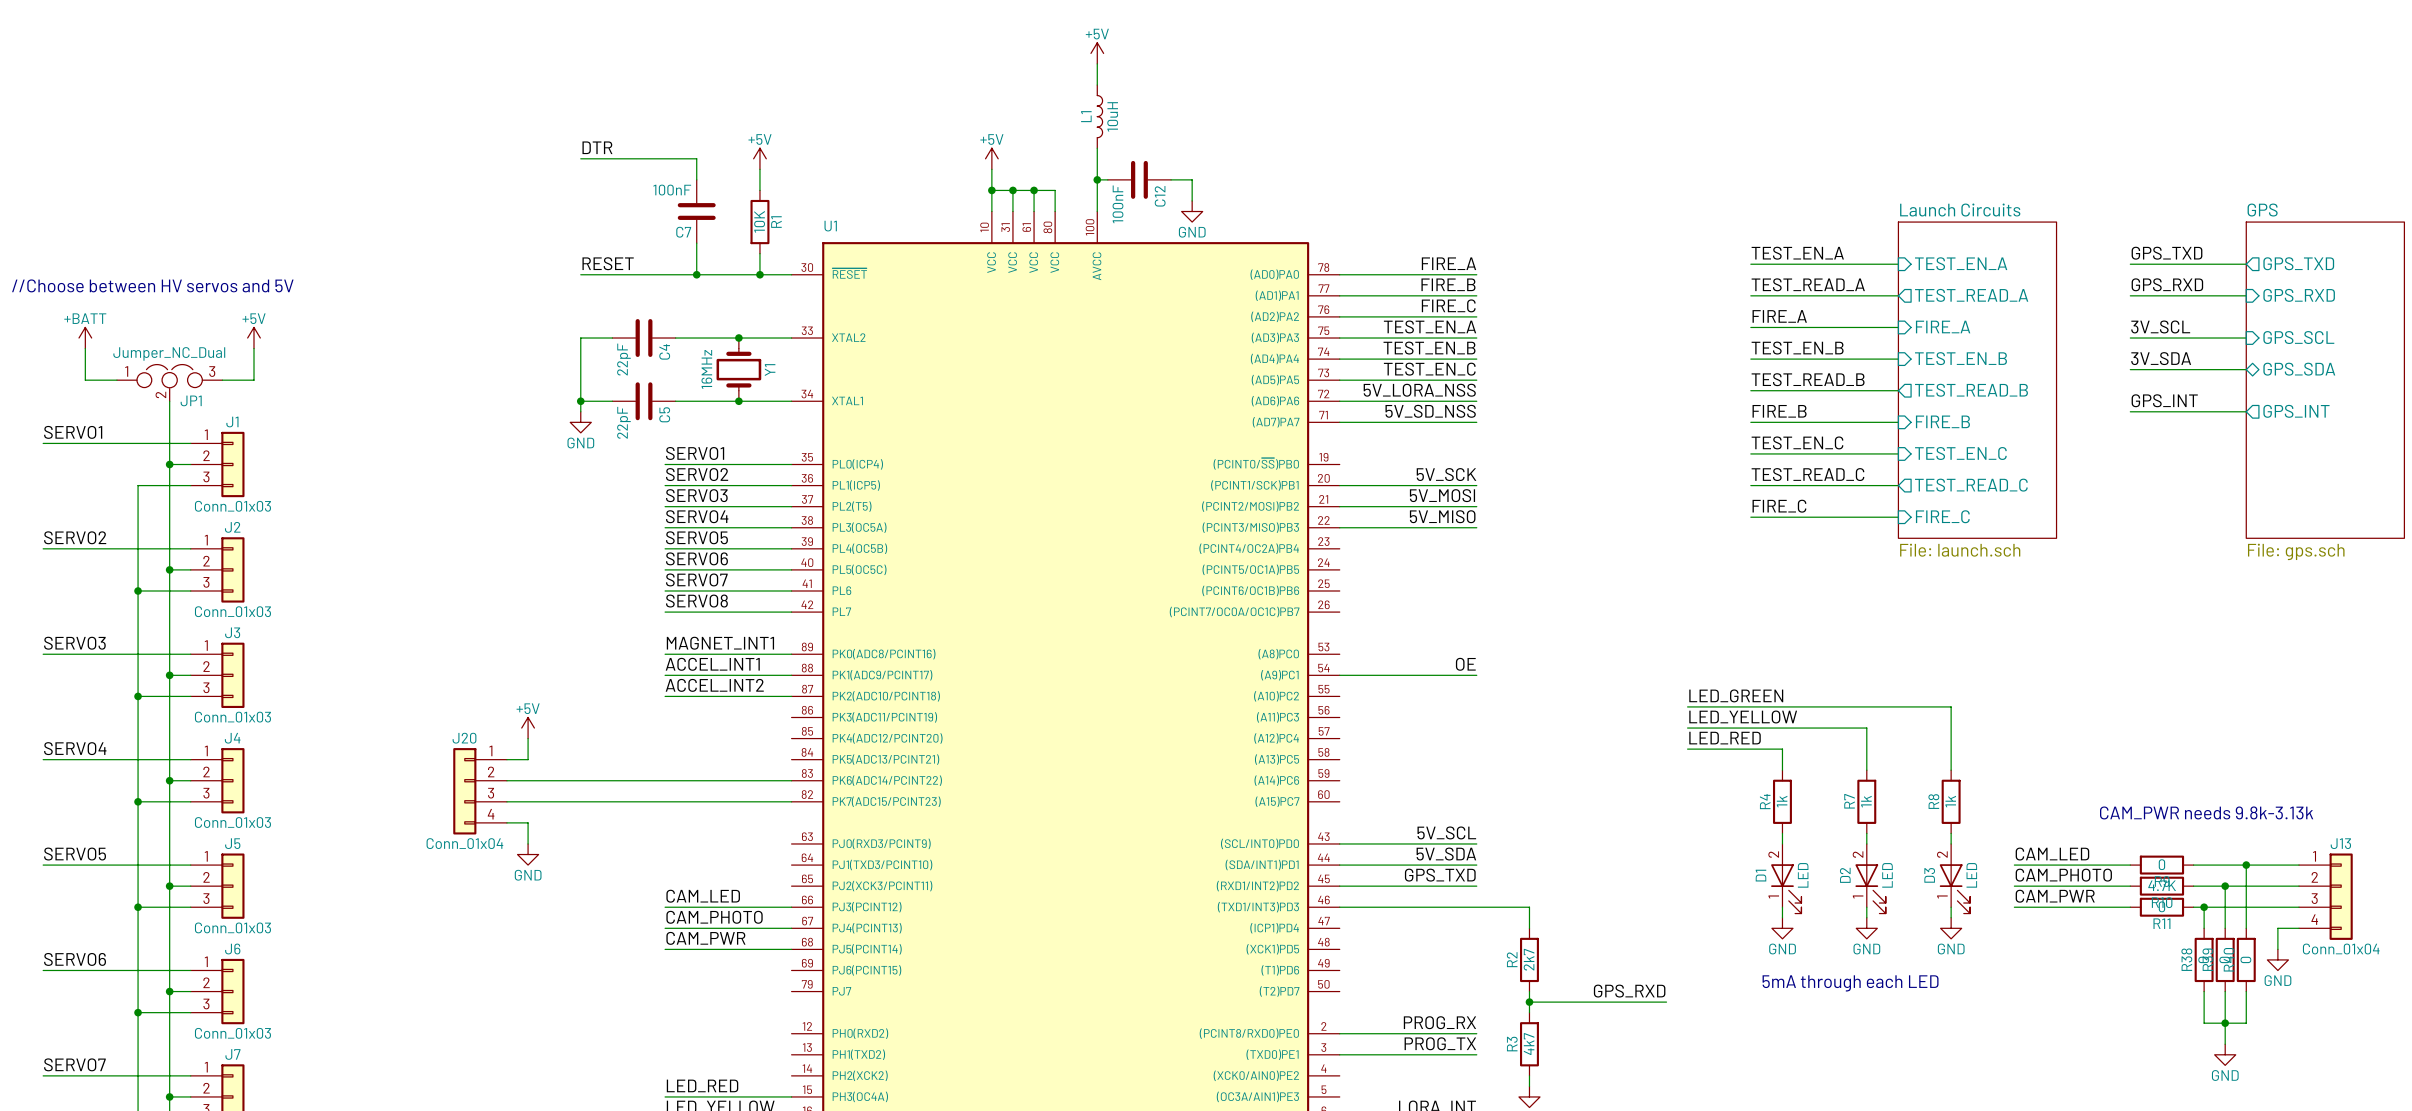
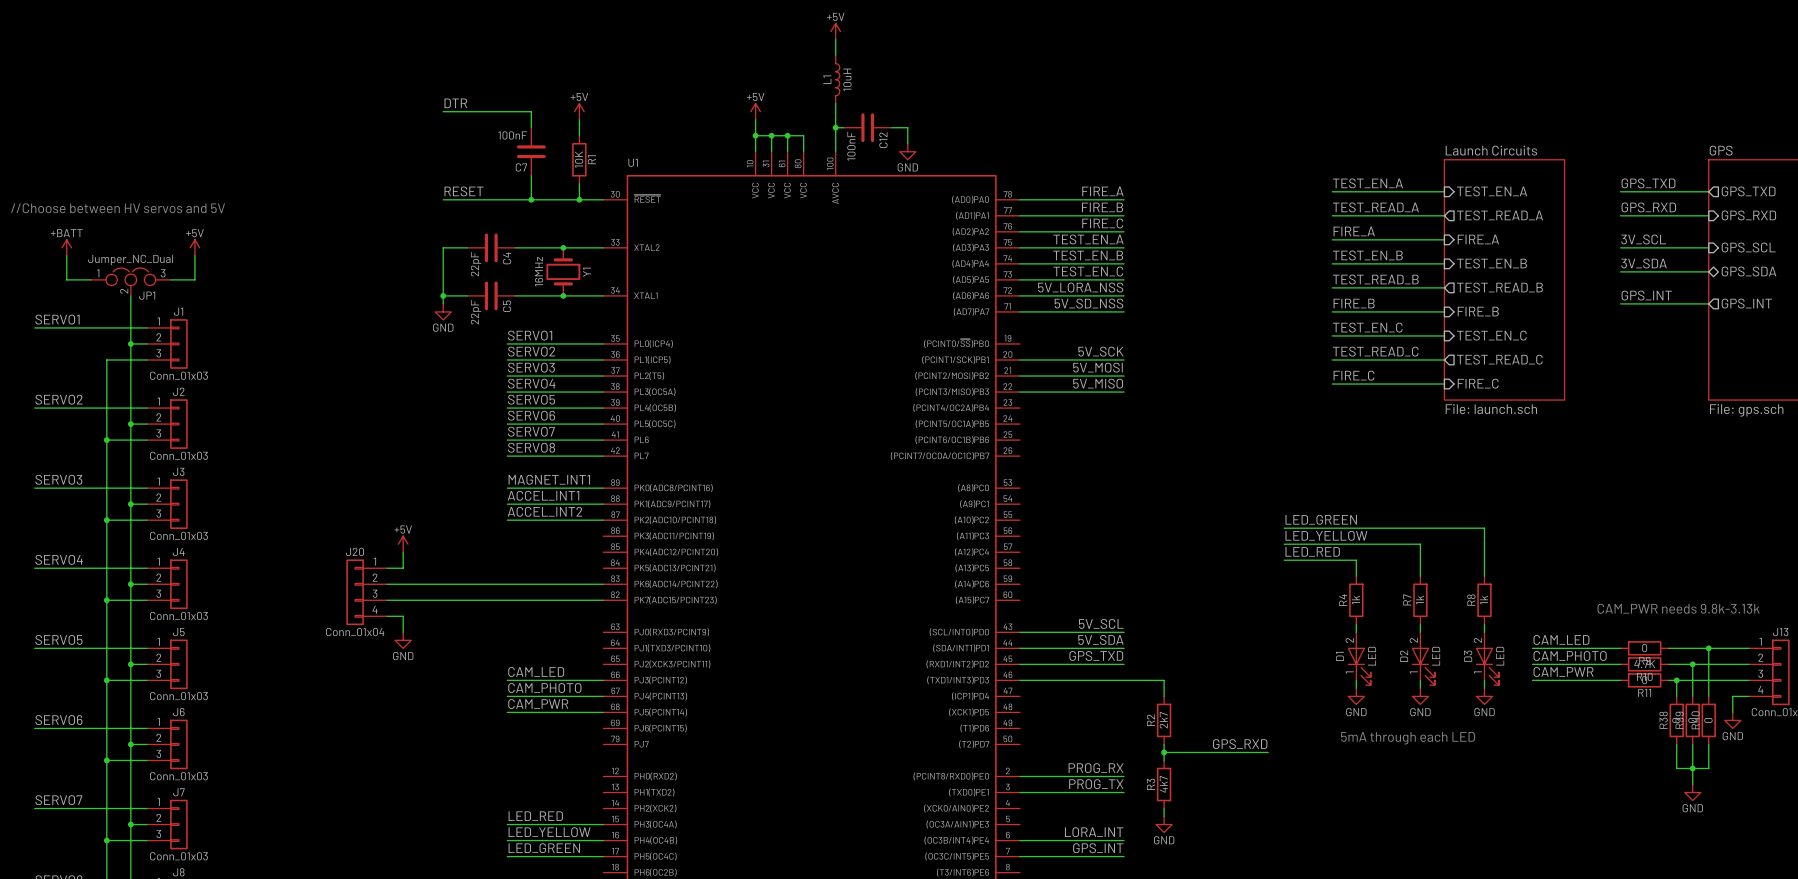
label: OE (1465, 664) -> none
wire: (1339, 675) (1476, 675) -> none

